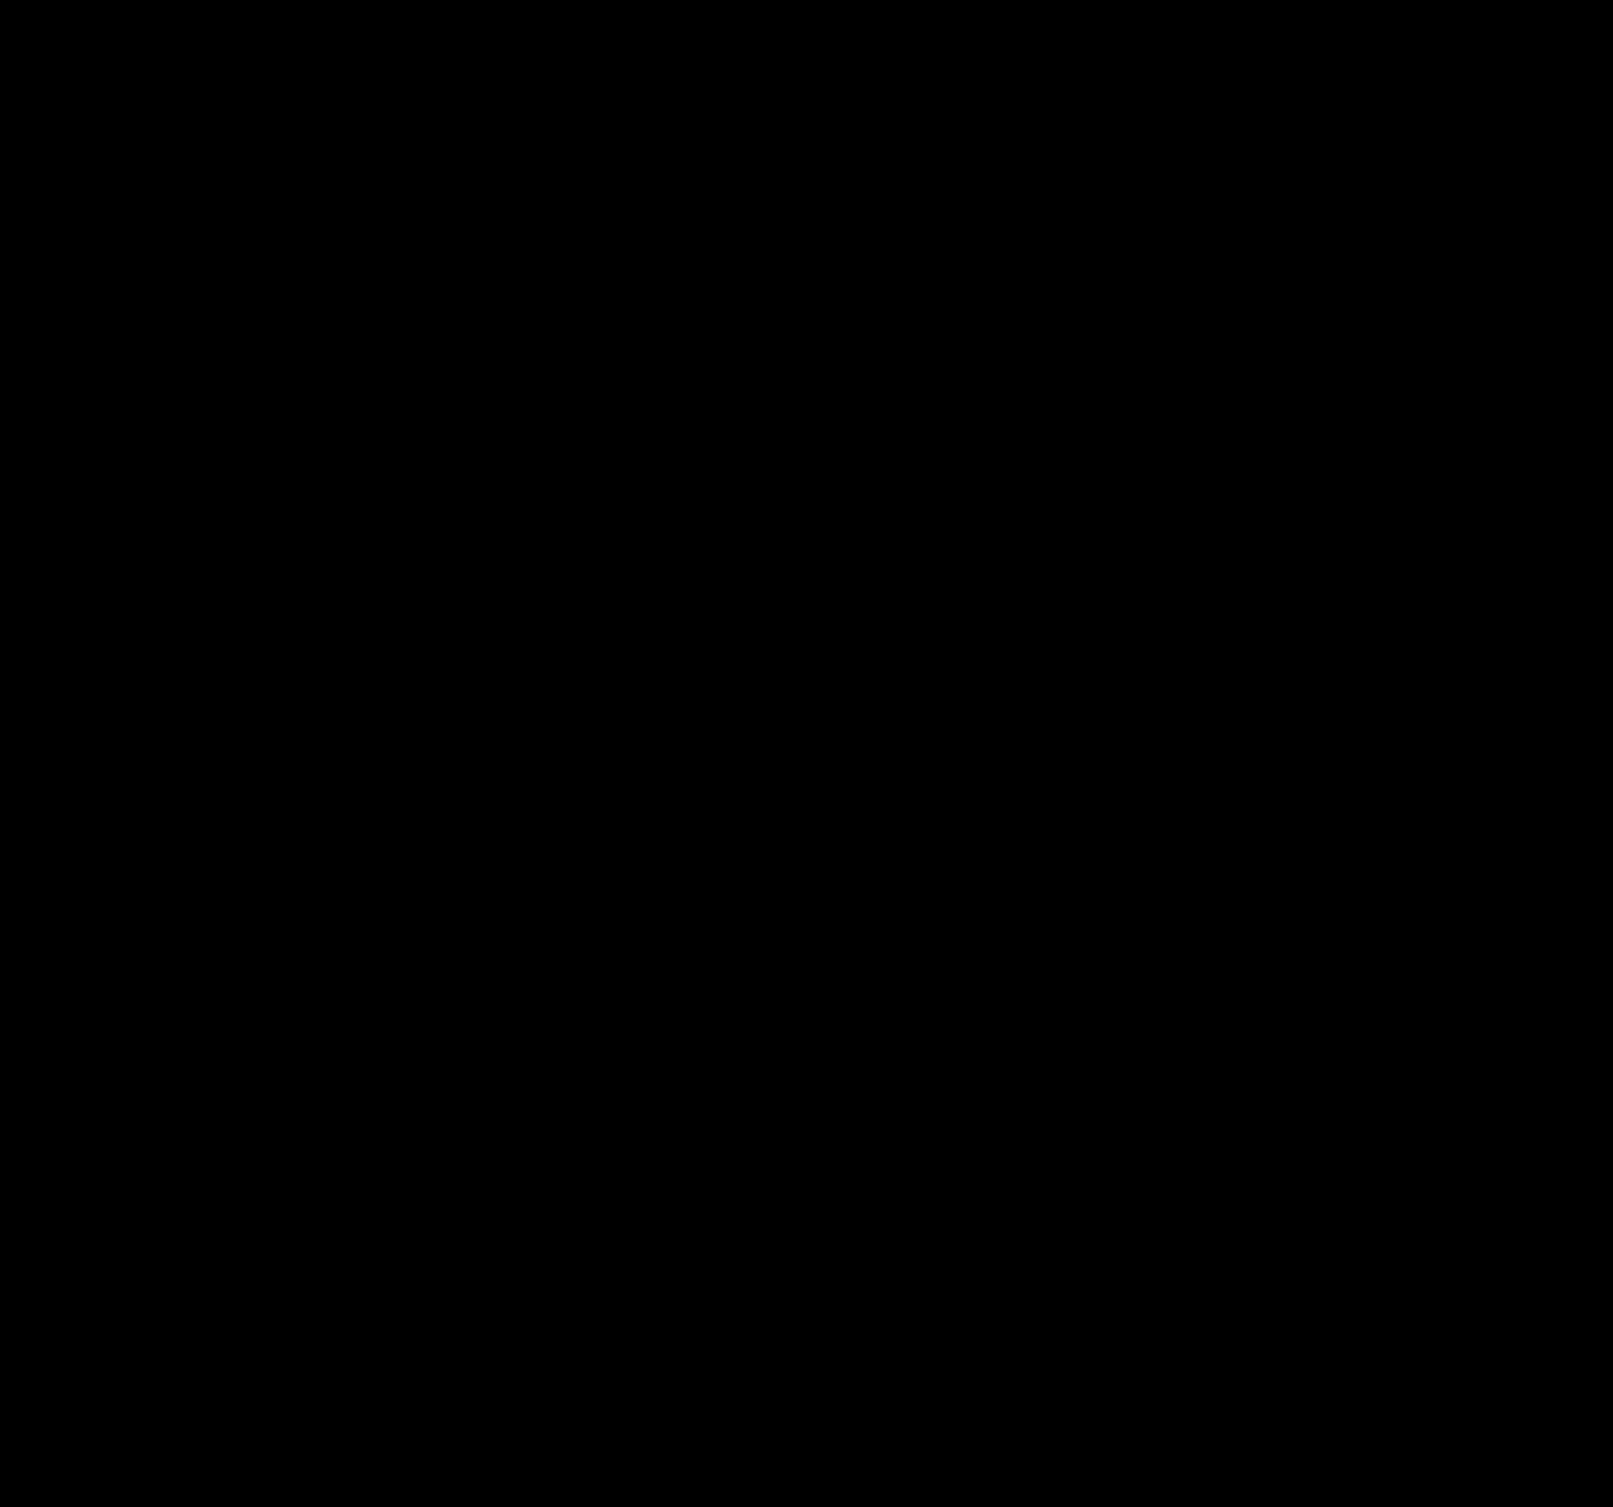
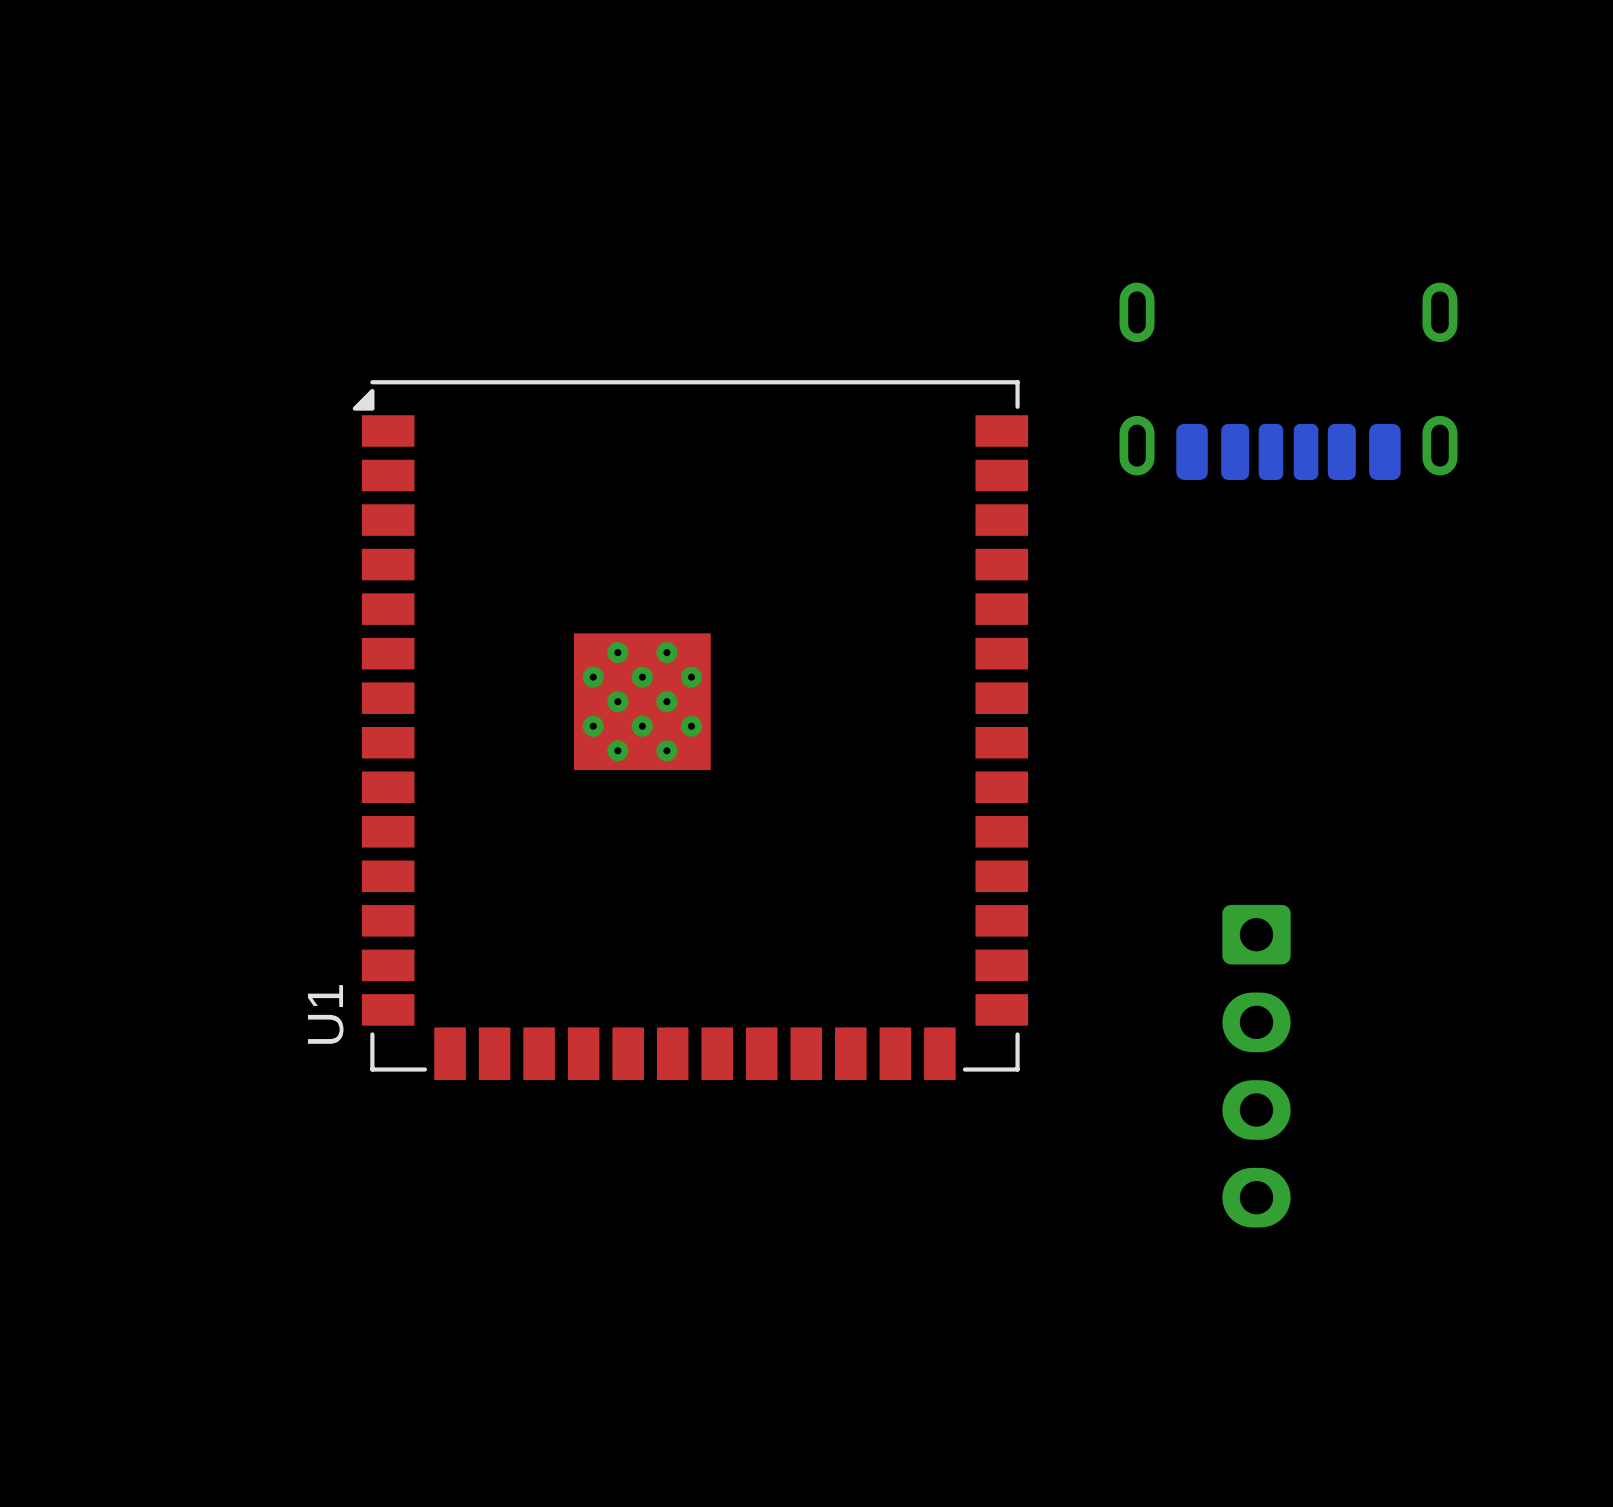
part: none -> (1288, 381)
U1: none -> (690, 730)
part: none -> (1256, 1066)

